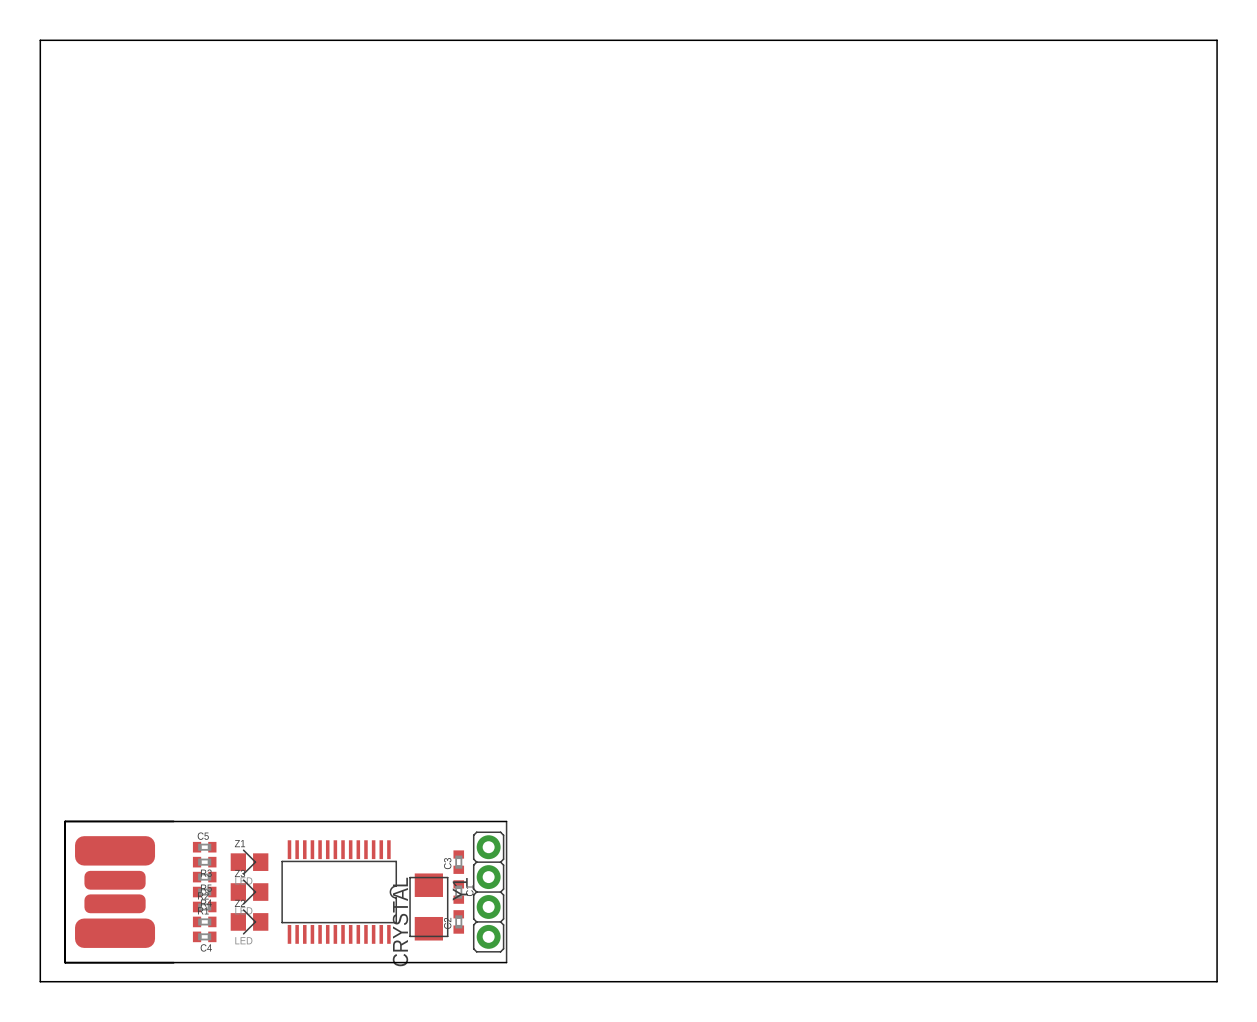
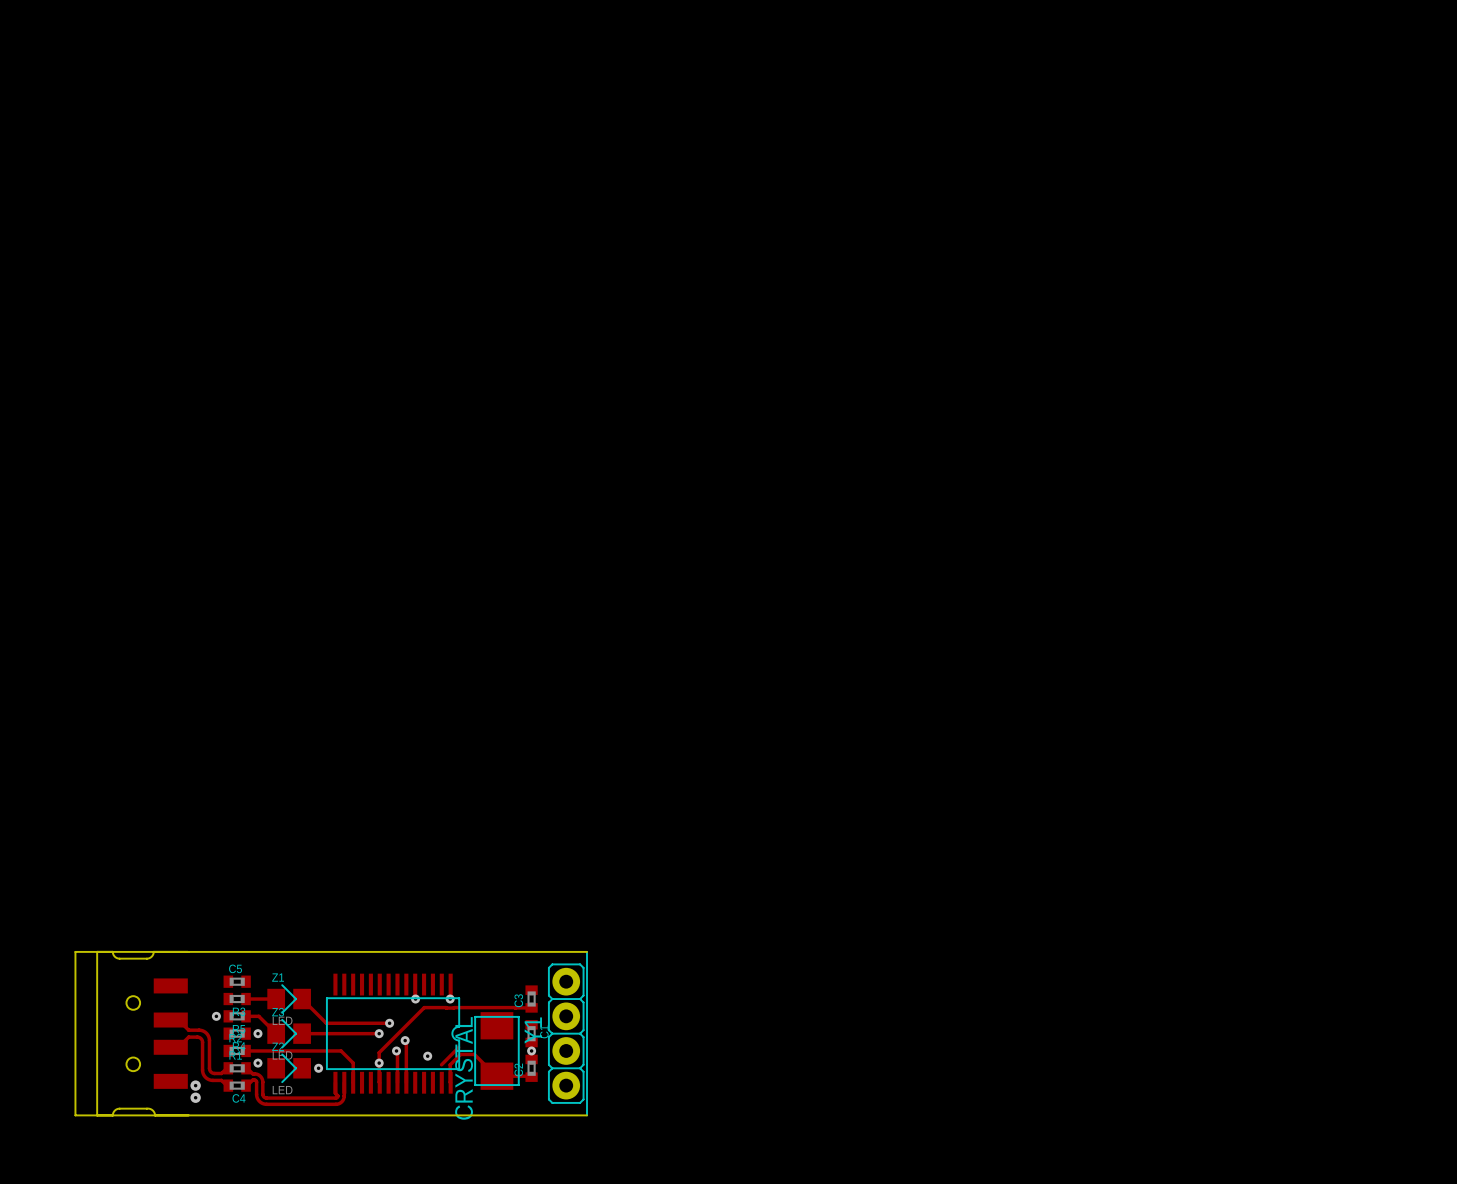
board edge: (40, 40) (1217, 40) (1217, 981) (40, 981) (40, 40) -> none
part footprint: [64, 820, 175, 964] -> [96, 950, 189, 1117]
track: none -> (246, 999) (276, 999)
track: none -> (302, 999) (326, 1023) (389, 1023)
via: none -> (415, 999)
via: none -> (450, 999)
track: none -> (531, 1007) (424, 1007) (379, 1052) (379, 1082)
via: none -> (216, 1016)
track: none -> (246, 1016) (258, 1016) (276, 1033)
track: none -> (170, 1020) (178, 1020) (188, 1030) (201, 1030) (207, 1034) (209, 1040) (209, 1068) (211, 1072) (221, 1073) (228, 1068)
via: none -> (389, 1023)
via: none -> (257, 1033)
track: none -> (302, 1033) (379, 1033)
via: none -> (379, 1033)
track: none -> (405, 1040) (406, 1082)
via: none -> (405, 1040)
track: none -> (170, 1047) (178, 1047) (188, 1037) (199, 1037) (202, 1041) (203, 1075) (210, 1080) (221, 1080) (228, 1085)
track: none -> (458, 1047) (441, 1064)
track: none -> (246, 1050) (341, 1050) (353, 1063) (353, 1082)
track: none -> (396, 1050) (397, 1082)
via: none -> (396, 1050)
via: none -> (531, 1050)
via: none -> (427, 1056)
via: none -> (257, 1063)
via: none -> (379, 1063)
track: none -> (246, 1068) (261, 1077) (262, 1095) (266, 1098) (336, 1098) (337, 1096) (335, 1093) (335, 1082)
via: none -> (318, 1068)
track: none -> (531, 1077) (496, 1076) (474, 1054) (460, 1054) (450, 1064) (450, 1082)
track: none -> (344, 1082) (343, 1099) (335, 1104) (264, 1103) (257, 1098) (255, 1080) (252, 1080) (246, 1085)
via: none -> (195, 1085)
via: none -> (195, 1097)

